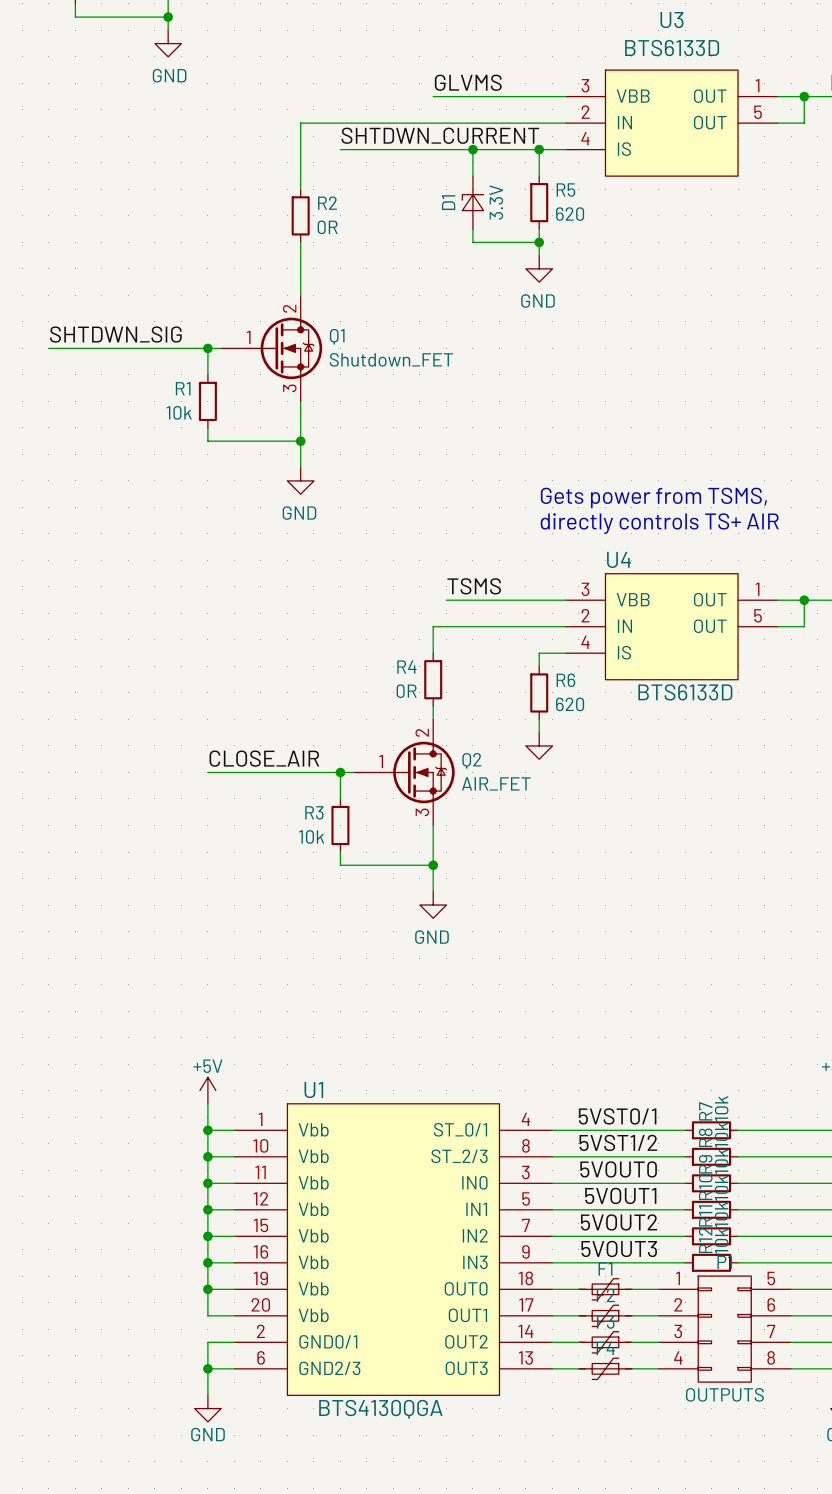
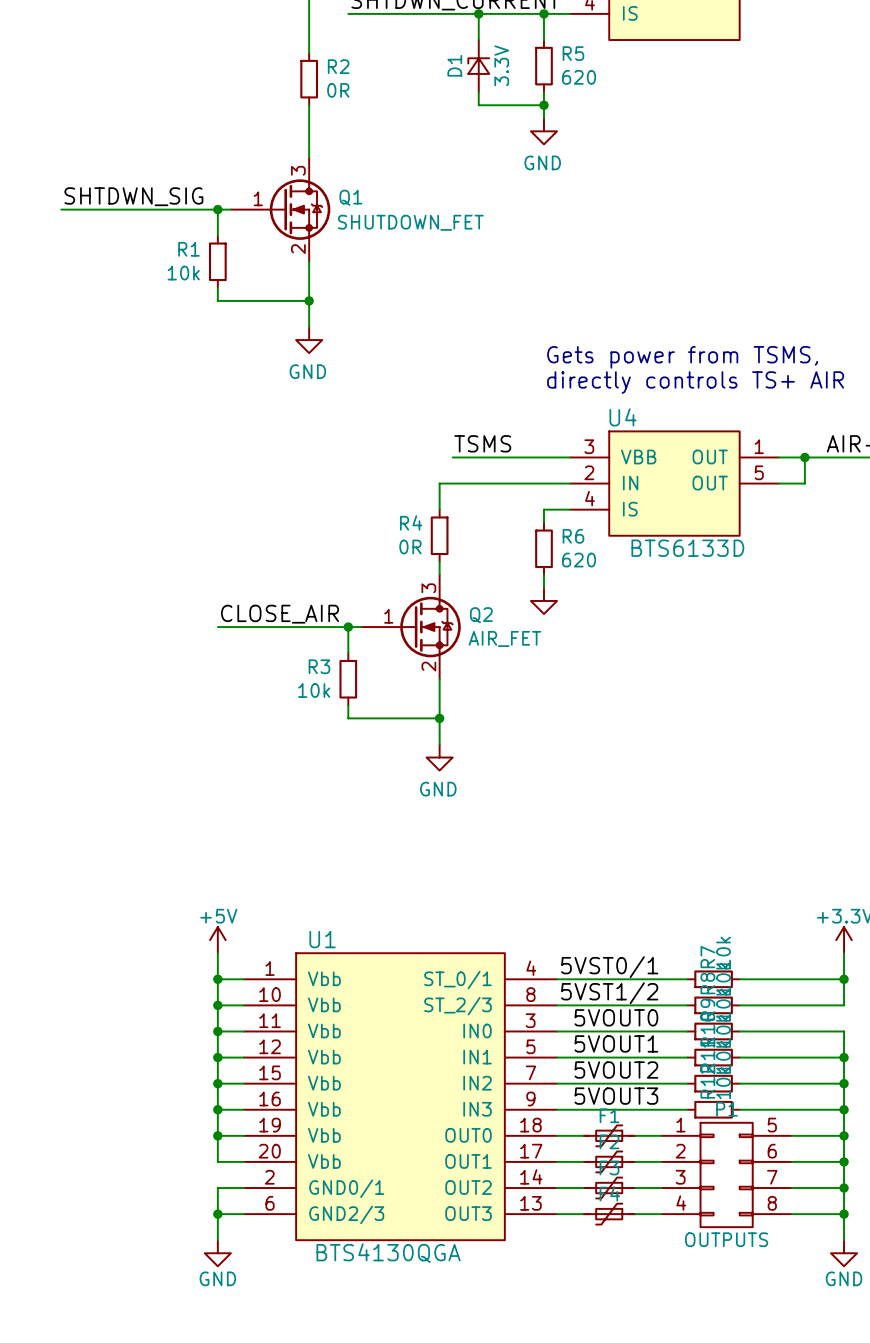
Q1 pin number: 2 (289, 308) -> 3 (298, 170)
Q1 value: Shutdown_FET (391, 359) -> SHUTDOWN_FET (410, 222)
Q1 pin number: 3 (289, 388) -> 2 (298, 249)
Q2 pin number: 2 (422, 732) -> 3 (428, 588)
Q2 pin number: 3 (422, 812) -> 2 (428, 666)

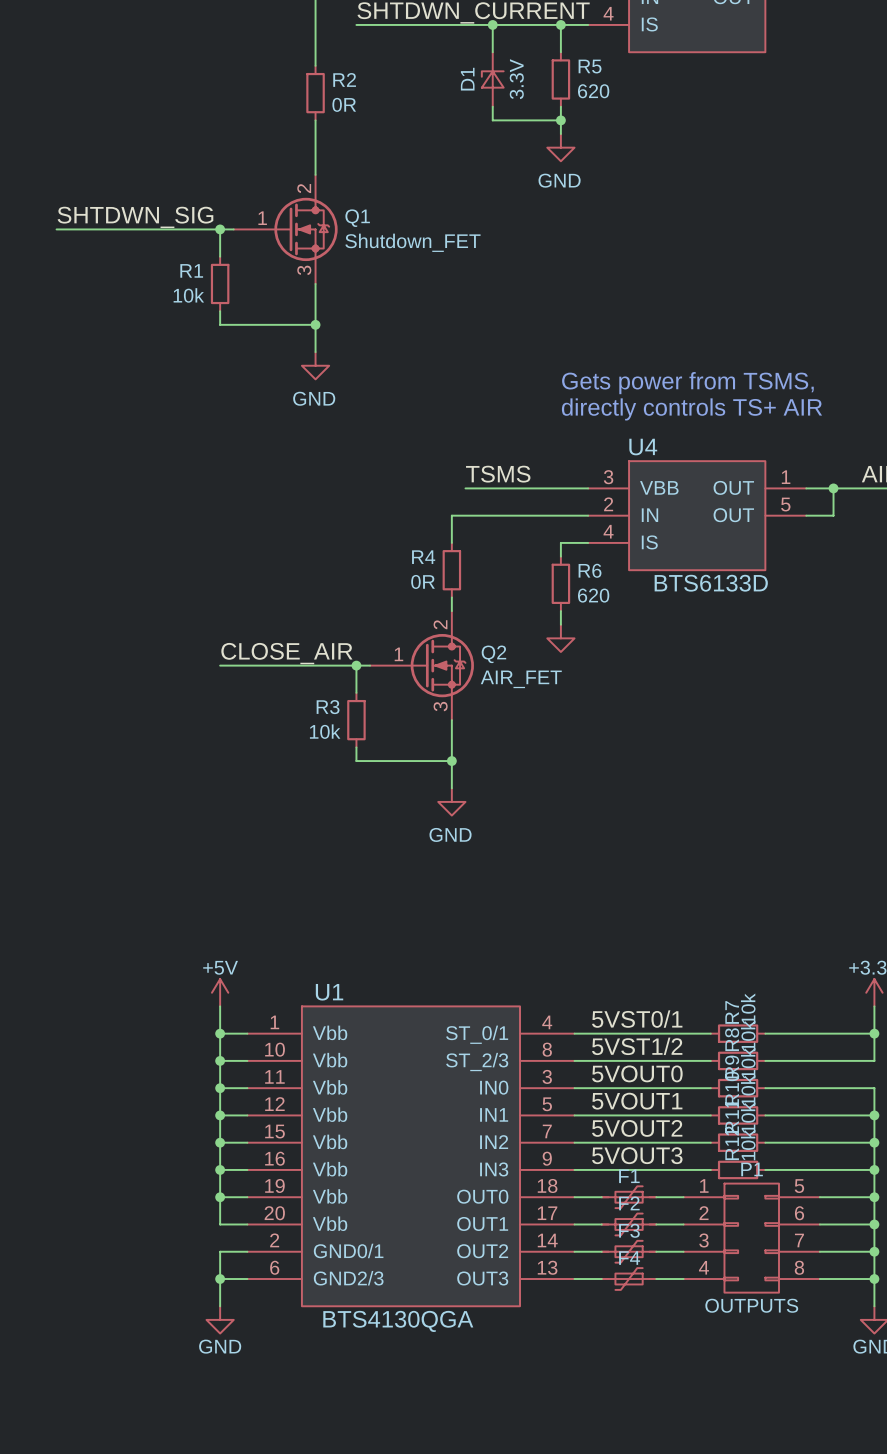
Q1 pin number: 3 (298, 170) -> 2 (304, 188)
Q1 value: SHUTDOWN_FET (410, 222) -> Shutdown_FET (412, 242)
Q1 pin number: 2 (298, 249) -> 3 (304, 270)
Q2 pin number: 3 (428, 588) -> 2 (440, 624)
Q2 pin number: 2 (428, 666) -> 3 (440, 706)

